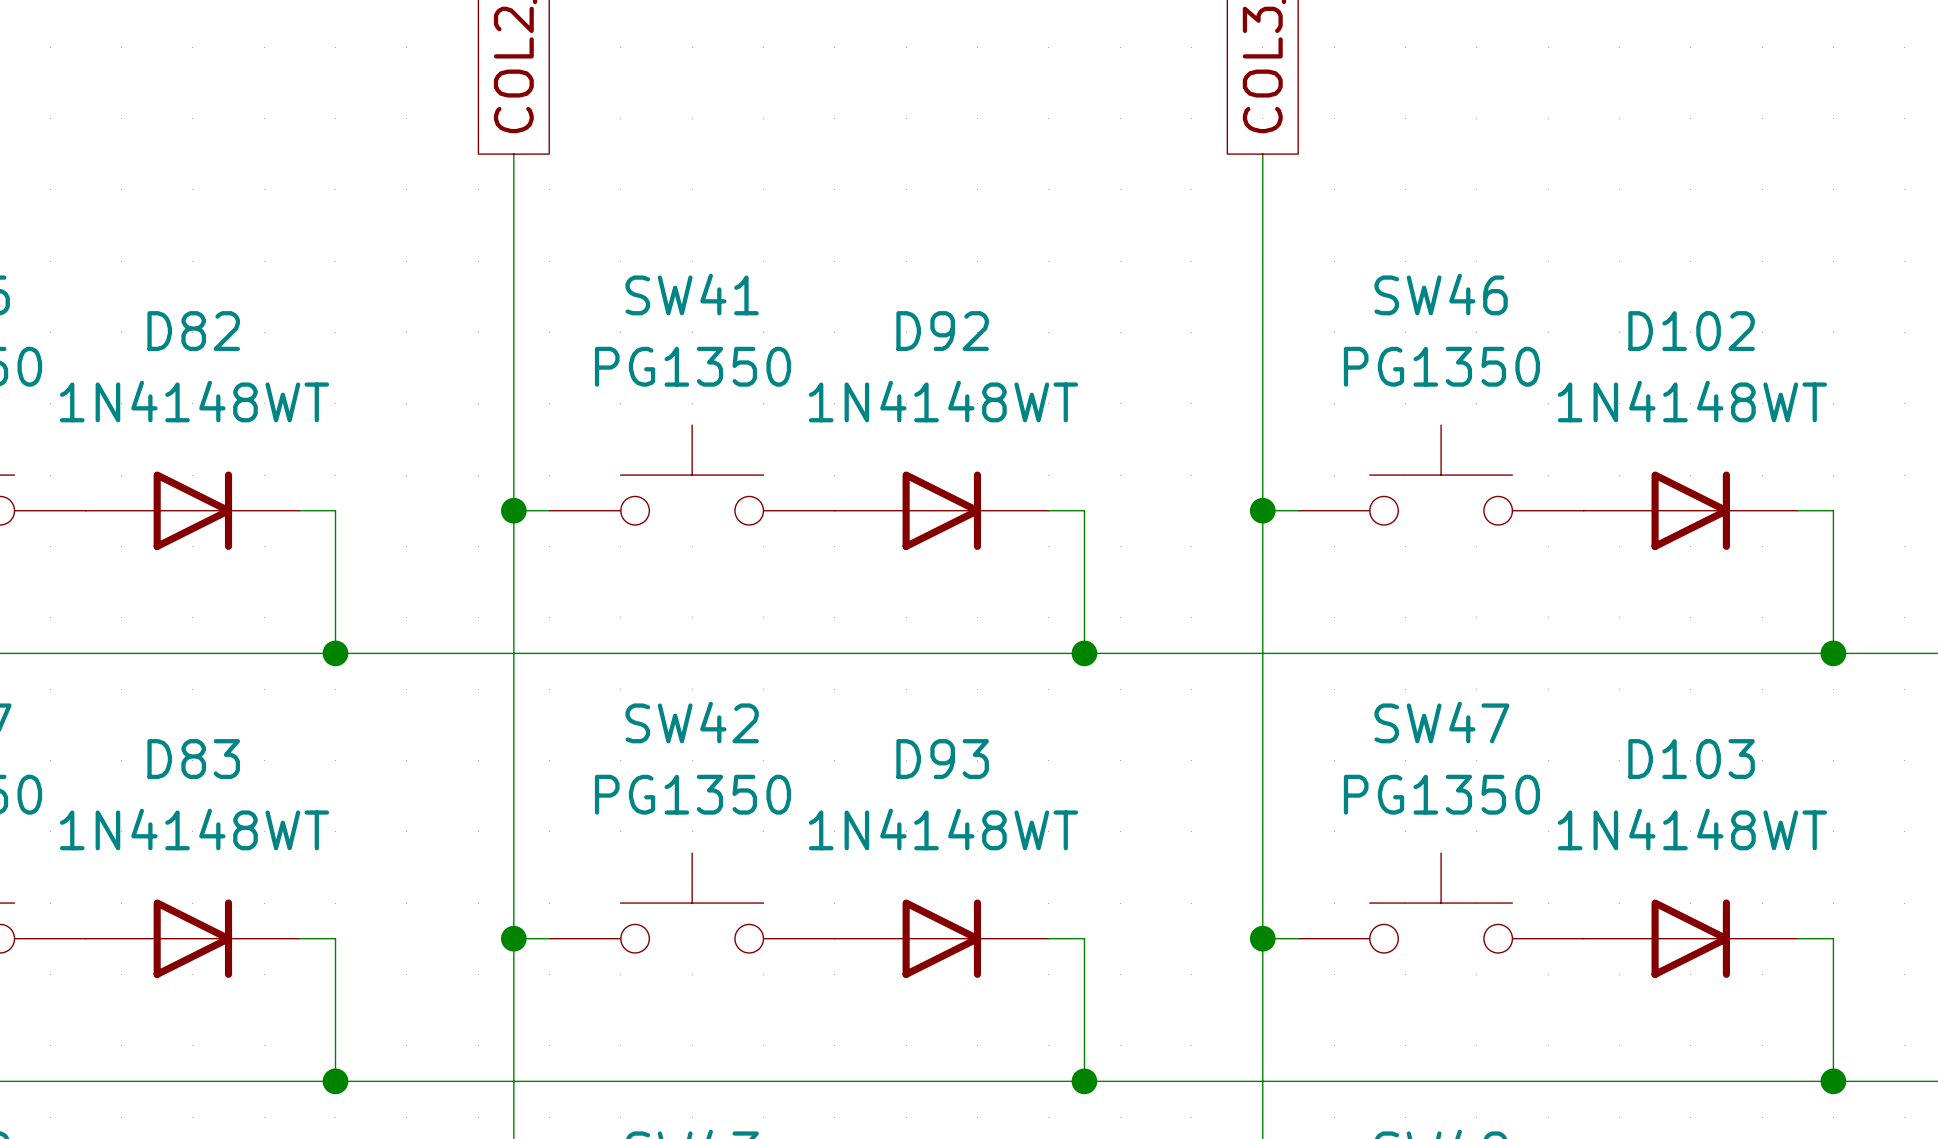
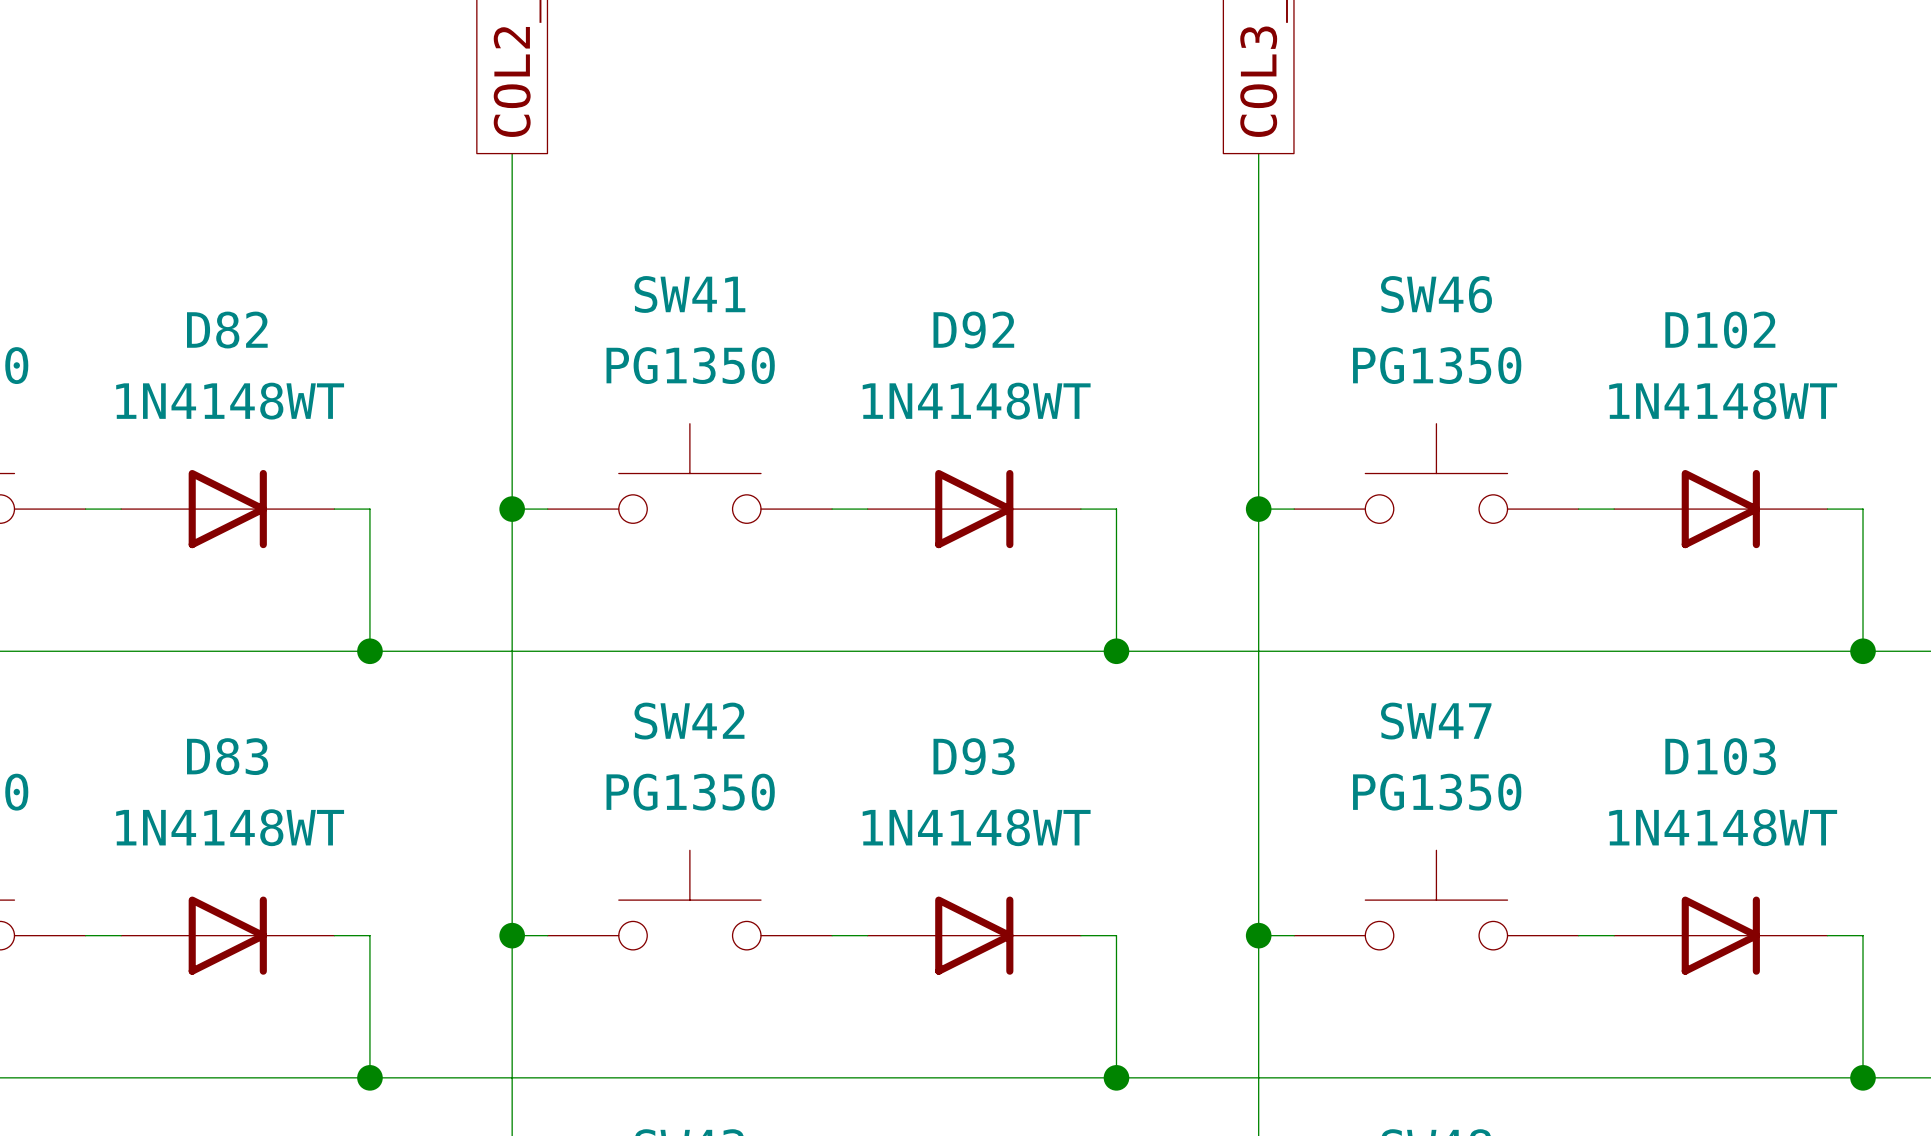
D82 position: (192, 510) -> (227, 509)
wire: (299, 510) (335, 510) (335, 653) -> (334, 509) (369, 509) (369, 651)
D92 position: (941, 510) -> (974, 509)
wire: (1048, 510) (1084, 510) (1084, 653) -> (1080, 509) (1116, 509) (1116, 651)
D102 position: (1690, 510) -> (1720, 509)
wire: (1797, 510) (1833, 510) (1833, 653) -> (1827, 509) (1863, 509) (1863, 651)
junction position: (335, 653) -> (369, 651)
junction position: (1084, 653) -> (1116, 651)
junction position: (1833, 653) -> (1863, 651)
D83 position: (192, 938) -> (227, 935)
wire: (299, 938) (335, 938) (335, 1081) -> (334, 935) (369, 935) (369, 1077)
D93 position: (941, 938) -> (974, 935)
wire: (1048, 938) (1084, 938) (1084, 1081) -> (1080, 935) (1116, 935) (1116, 1077)
D103 position: (1690, 938) -> (1720, 935)
wire: (1797, 938) (1833, 938) (1833, 1081) -> (1827, 935) (1863, 935) (1863, 1077)
junction position: (335, 1081) -> (369, 1077)
junction position: (1084, 1081) -> (1116, 1077)
junction position: (1833, 1081) -> (1863, 1077)

